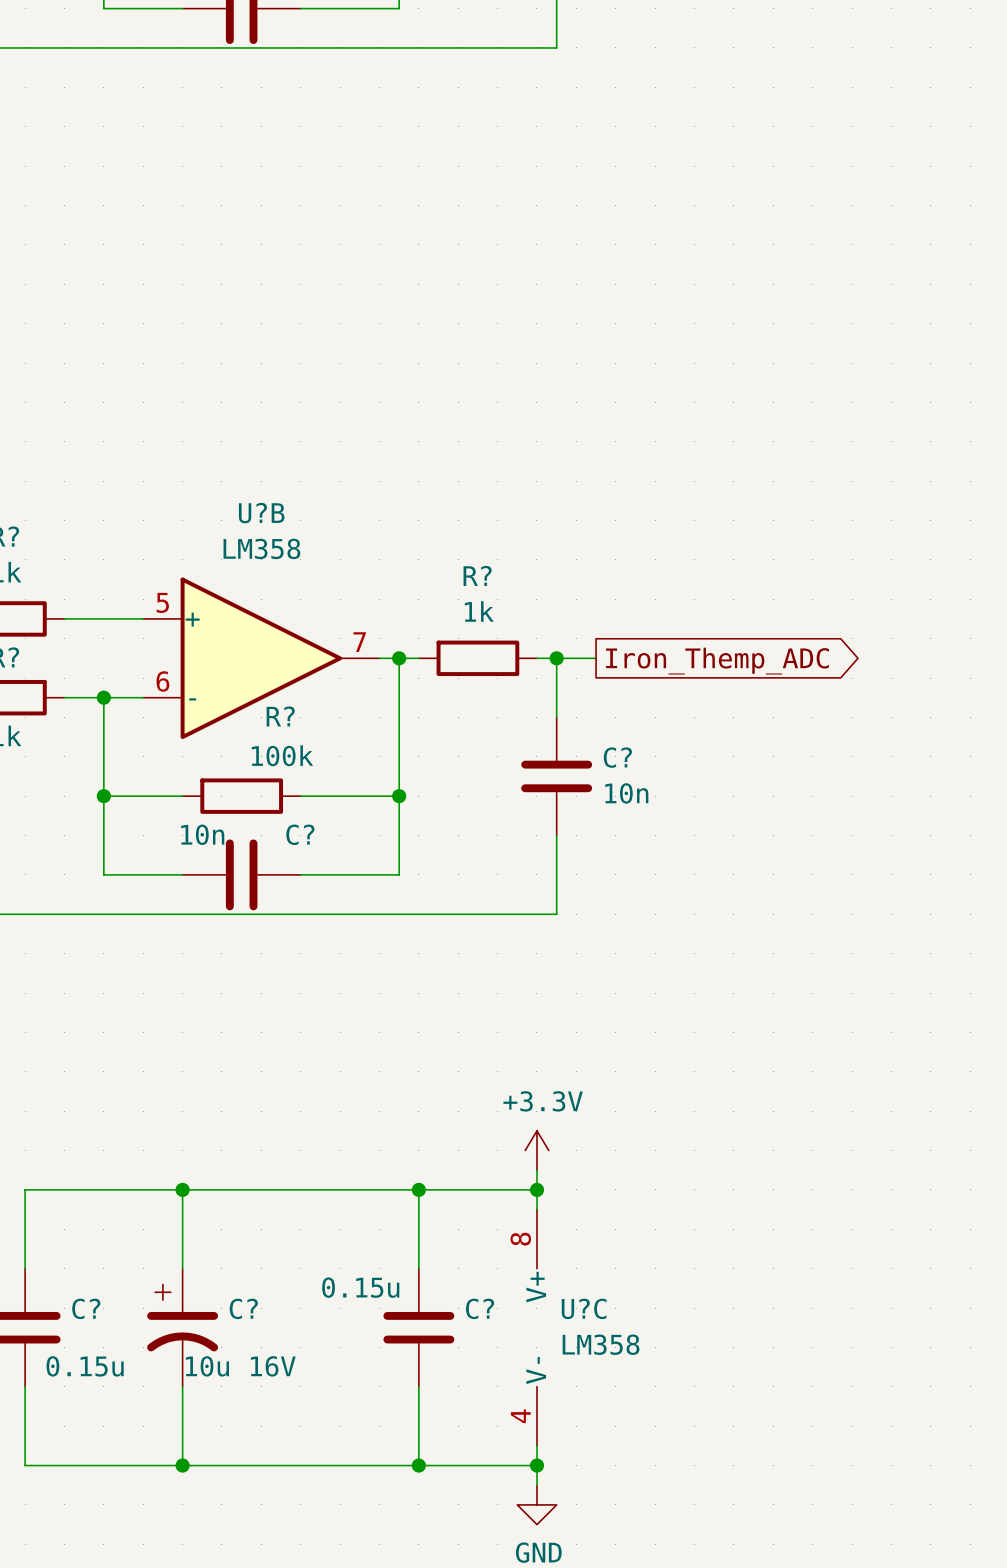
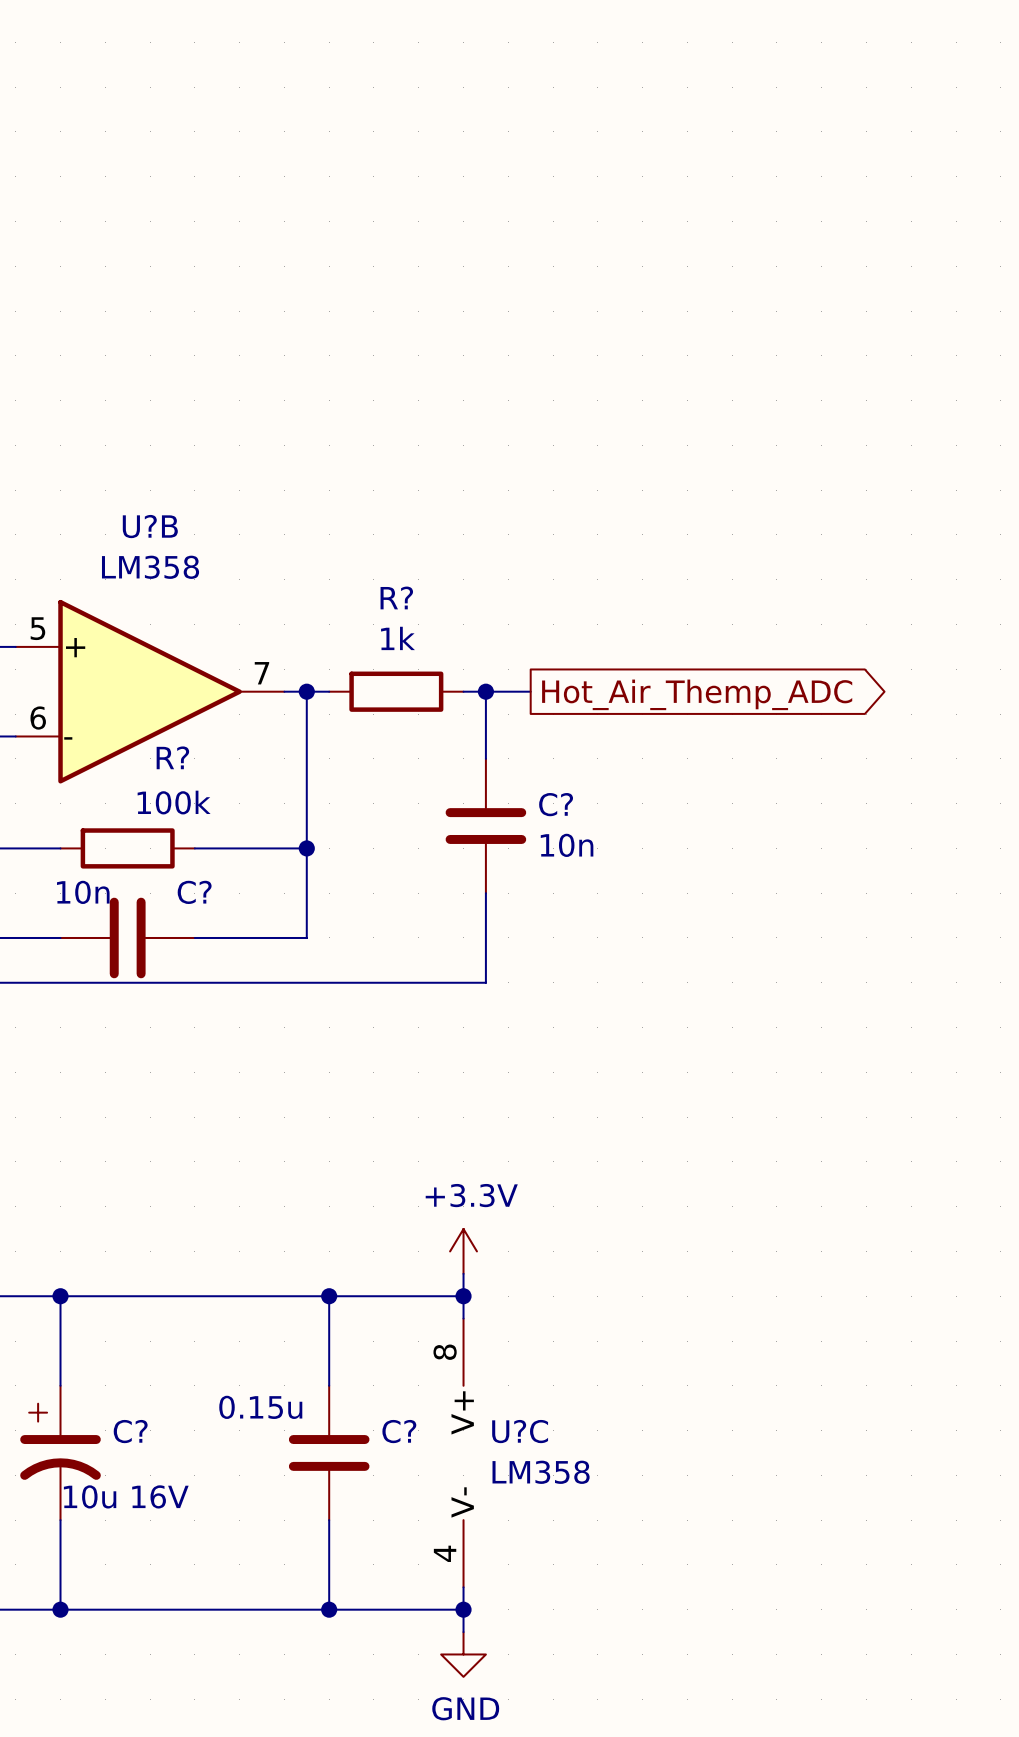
global label: Iron_Themp_ADC (717, 661) -> Hot_Air_Themp_ADC (697, 694)

